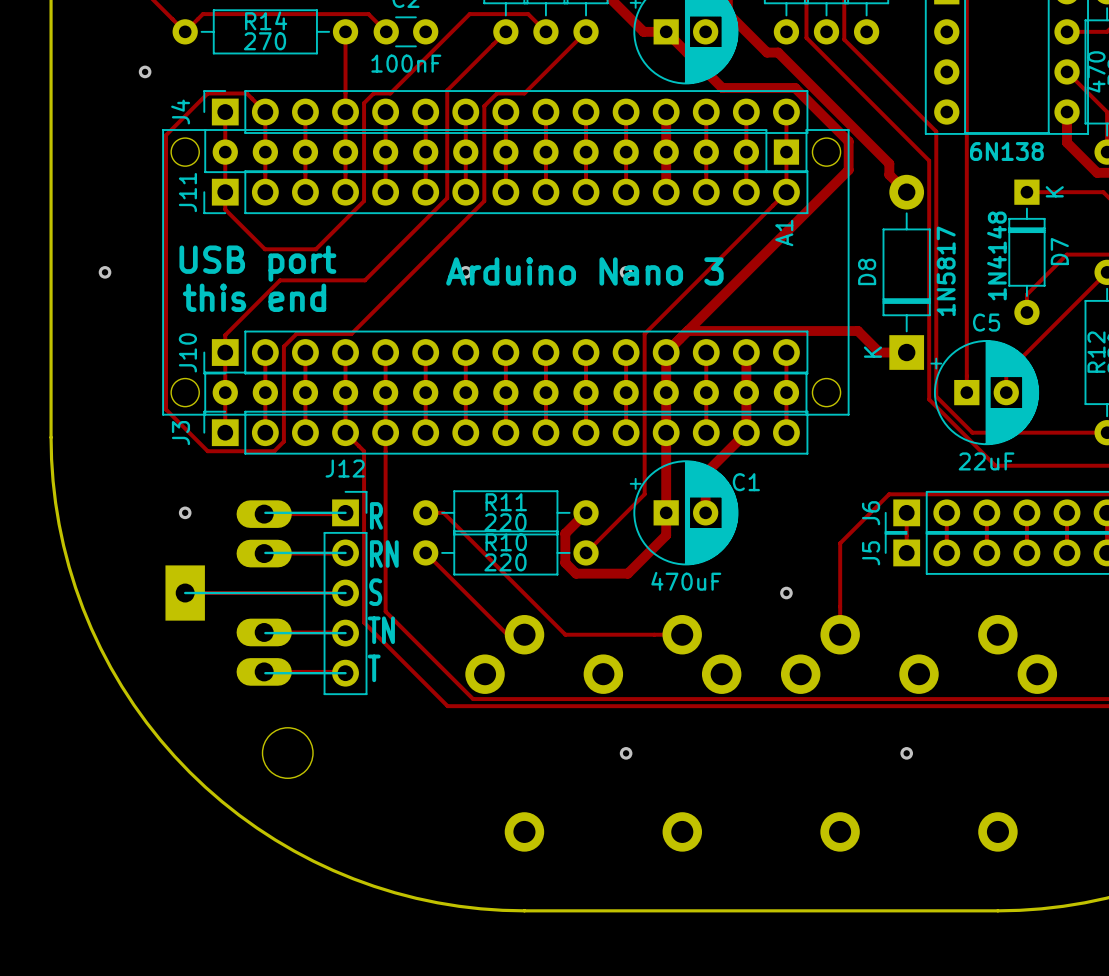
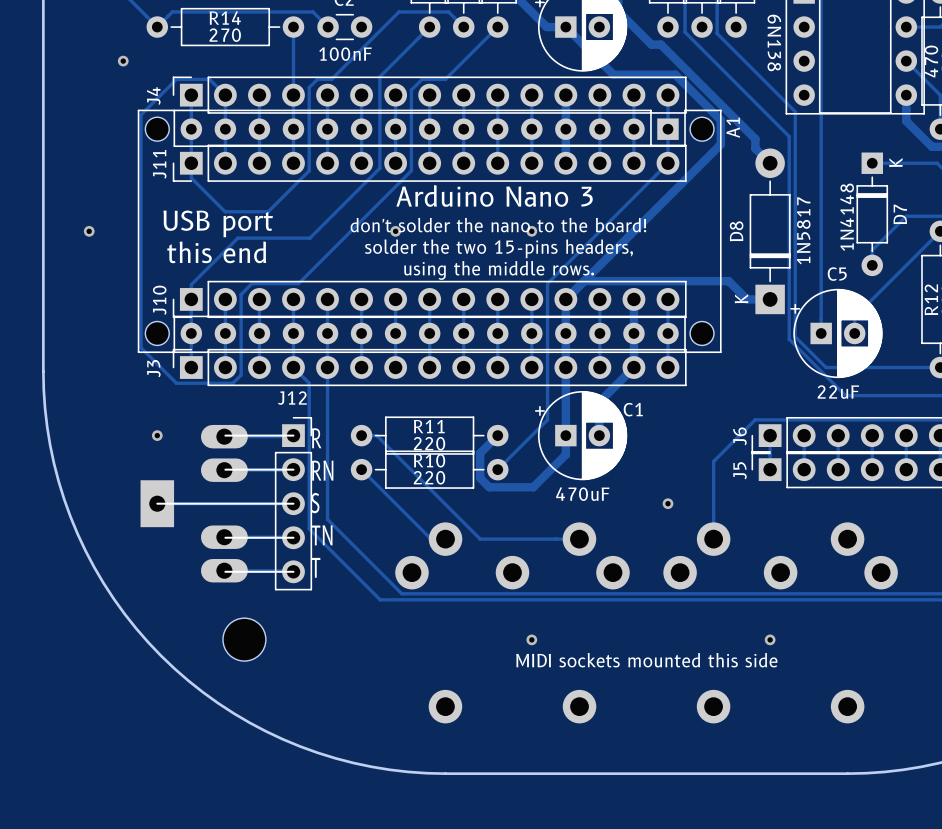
text rotation: 0° (1006, 151) -> 90° clockwise (774, 42)
text position: 6N138 (1006, 151) -> 6N138 (774, 42)
A1 name position: A1 (784, 233) -> A1 (733, 127)
text: none -> don't solder the nano to the board! (498, 225)
text position: Arduino Nano 3 (584, 271) -> Arduino Nano 3 (494, 195)
text: none -> solder the two 15-pins headers, (498, 248)
text: none -> using the middle rows. (499, 270)
text: none -> MIDI sockets mounted this side (646, 660)

